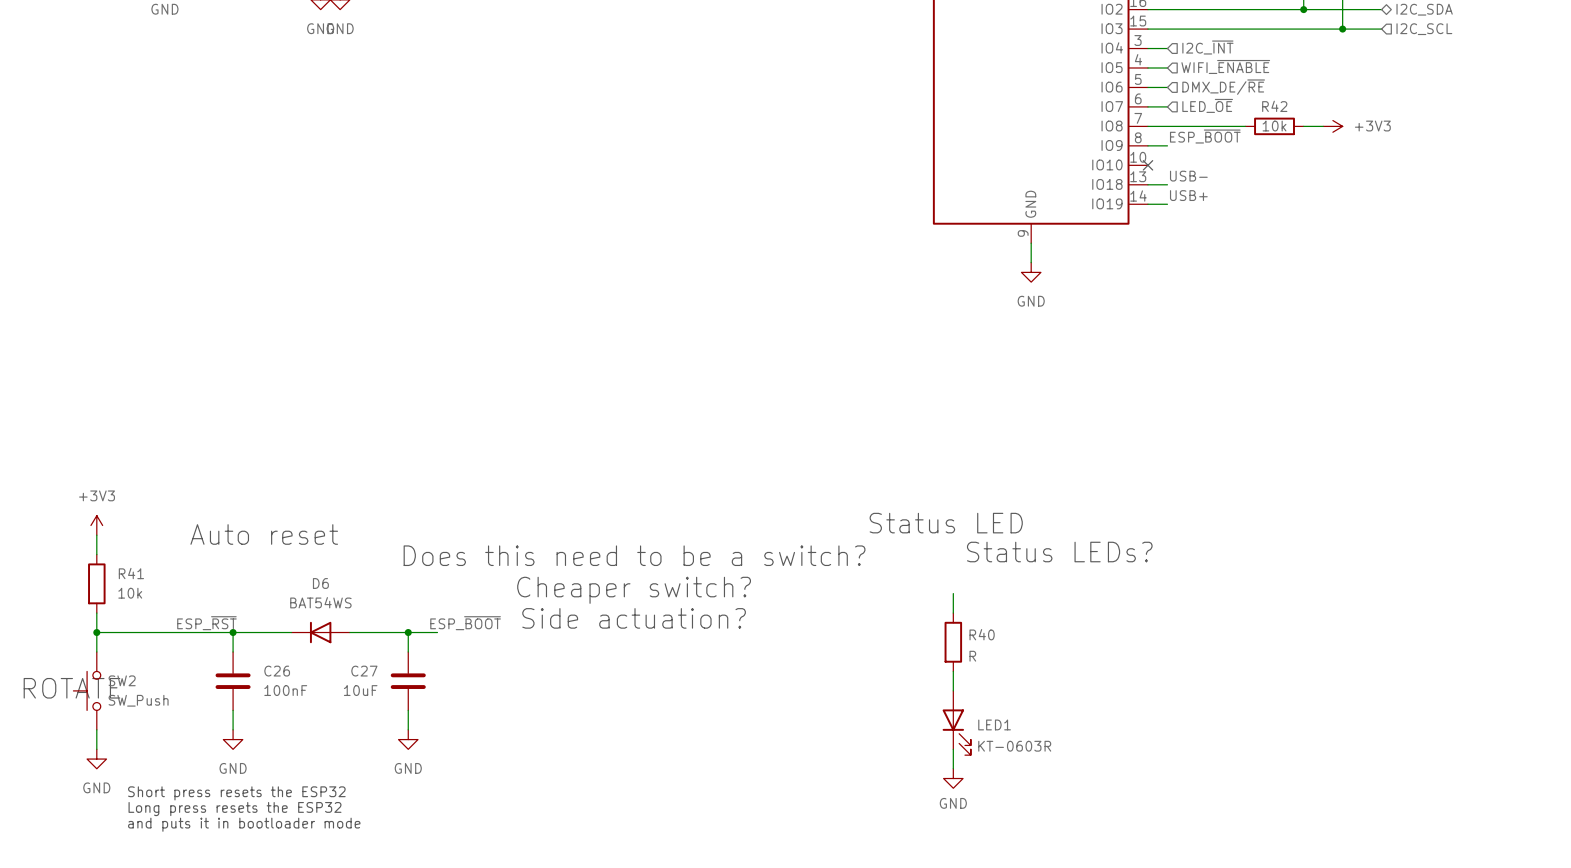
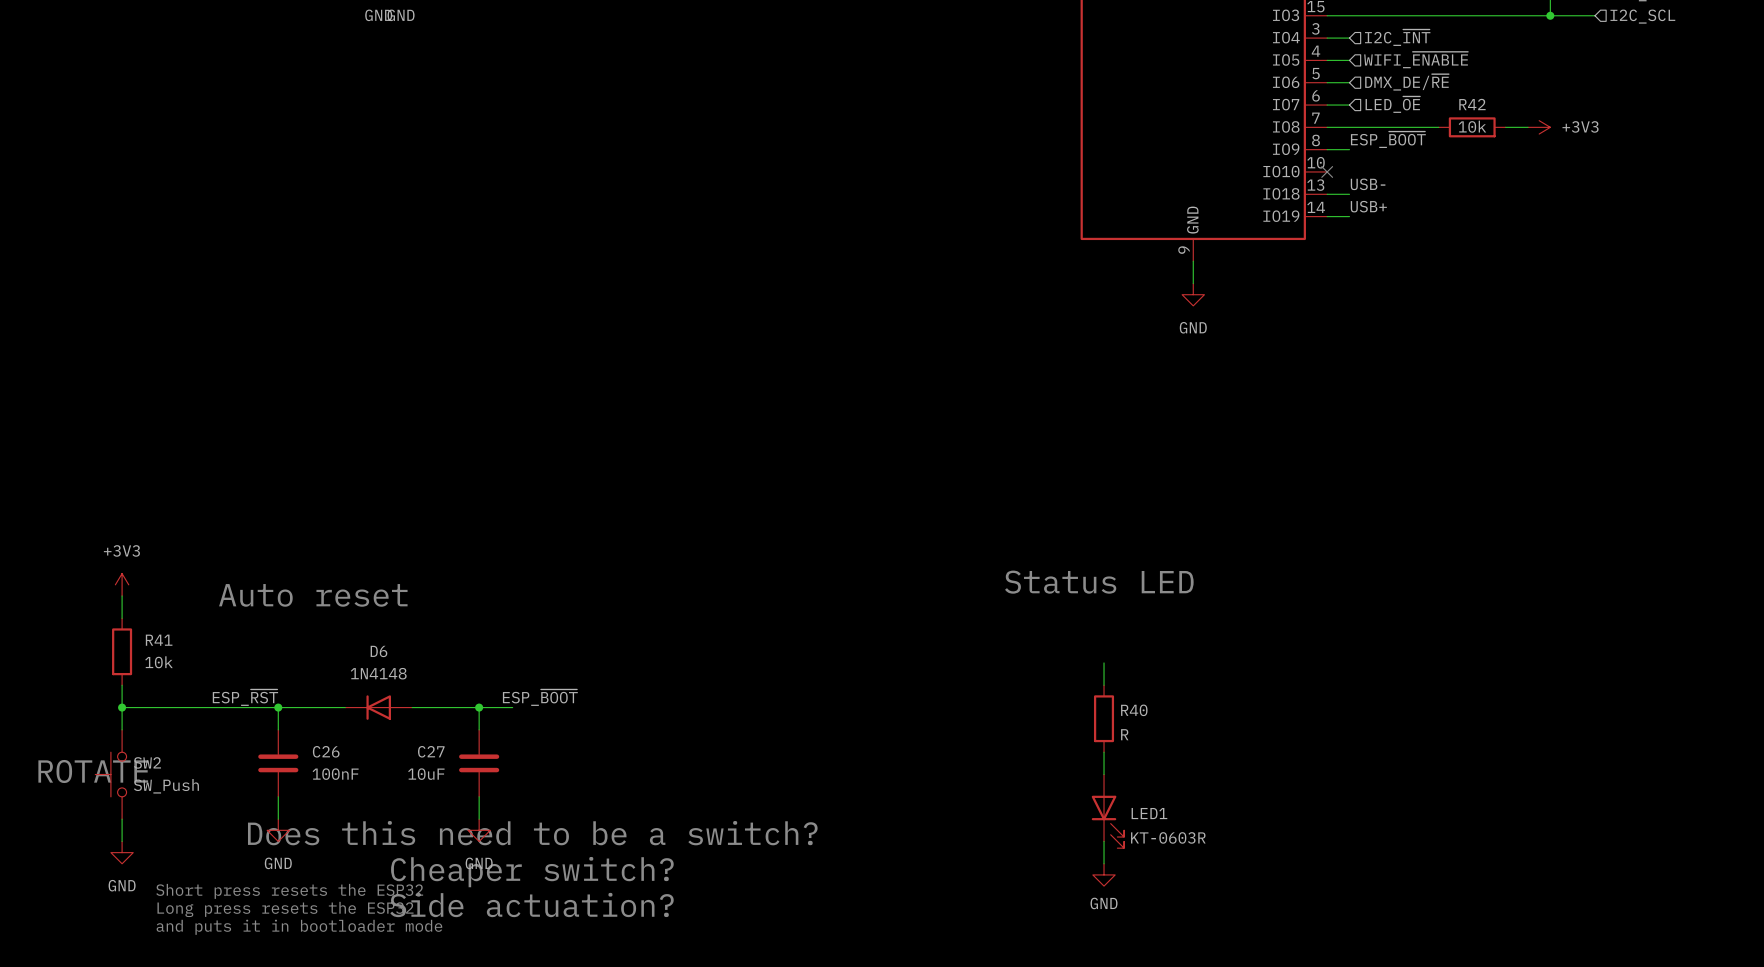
text: Status LEDs? (1059, 552) -> none
text: Does this need to be a switch? (634, 555) -> none
text: Cheaper switch? (634, 590) -> none
D6 value: BAT54WS (320, 602) -> 1N4148 (378, 673)
text: Side actuation? (634, 618) -> none
text: none -> Does this need to be a switch? (532, 833)
text: none -> Cheaper switch? (532, 872)
text: none -> Side actuation? (531, 905)

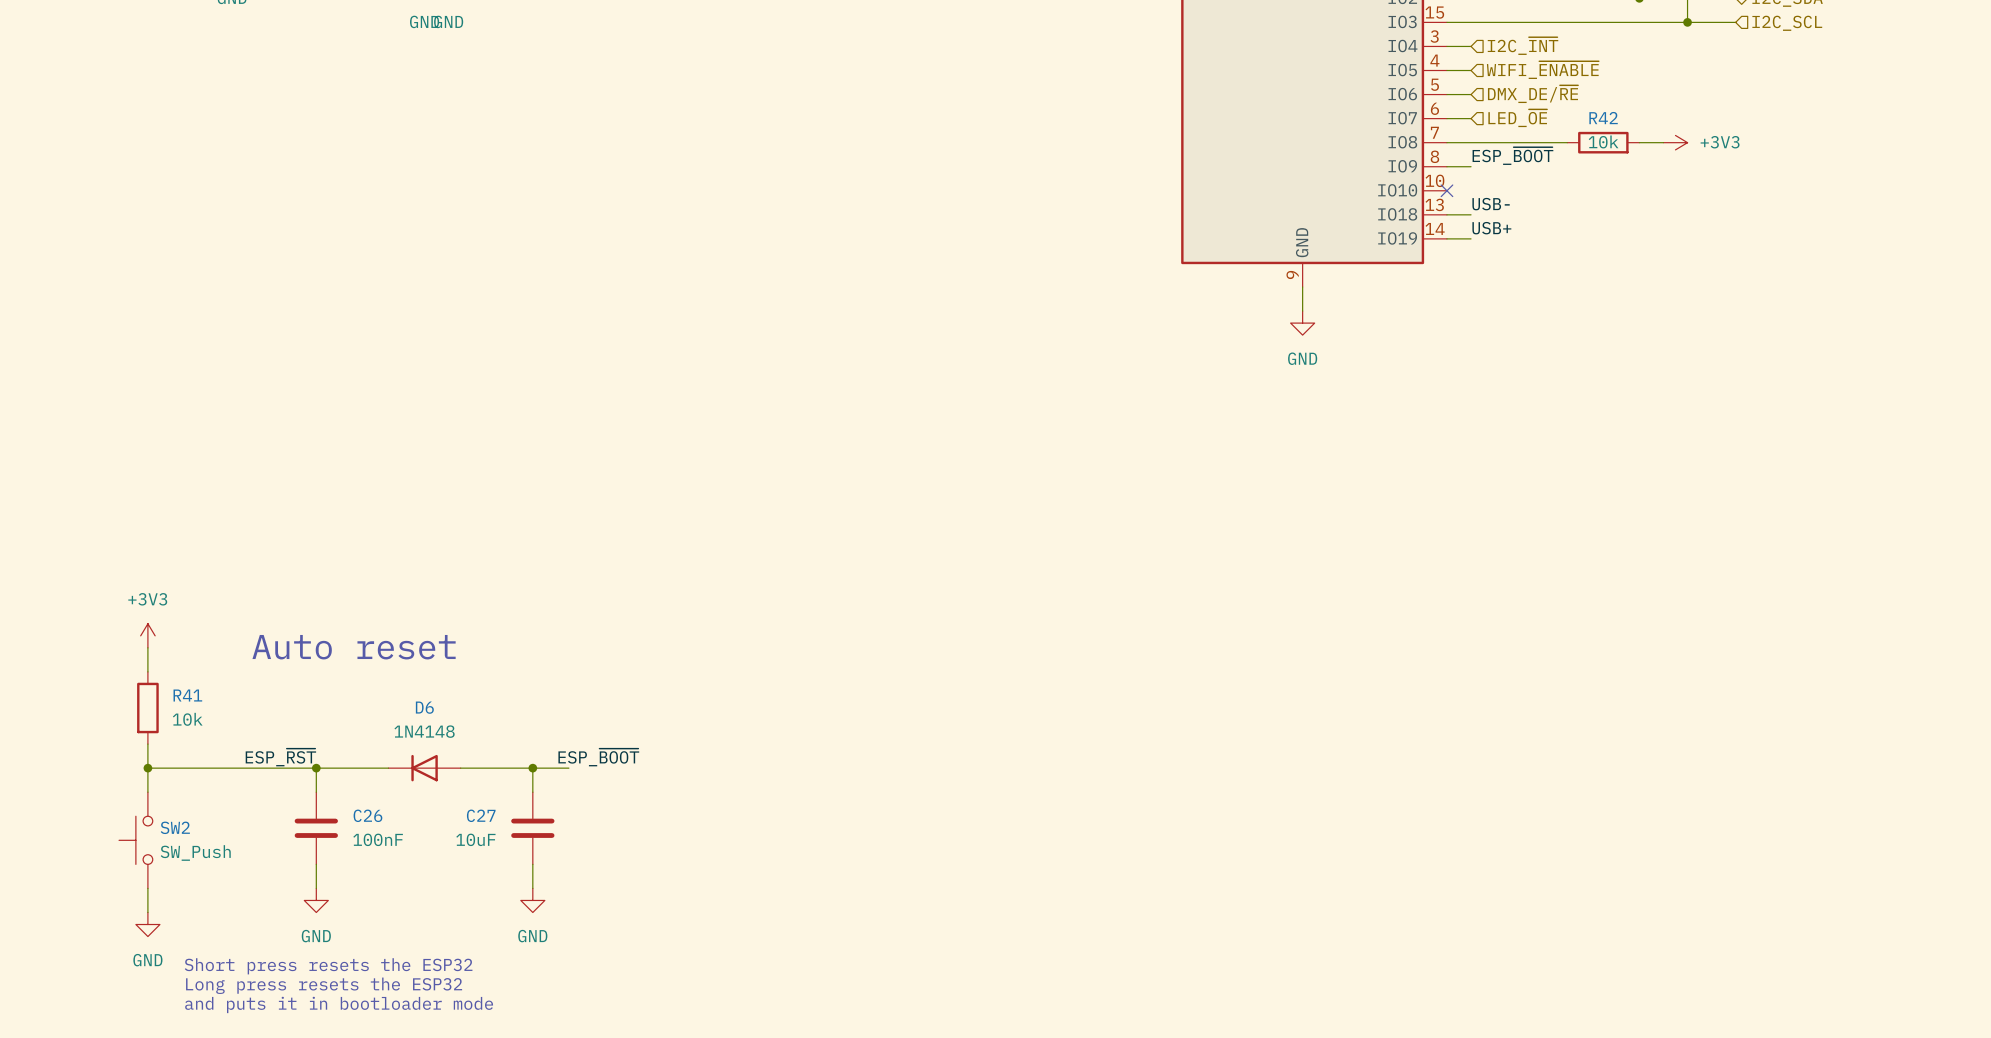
text: Status LED (1099, 582) -> none
wire: (1104, 662) (1104, 685) -> none
R40: R (1104, 718) -> none
wire: (1104, 752) (1104, 774) -> none
text: ROTATE (93, 771) -> none
LED1: KT-0603R (1107, 811) -> none
text: Does this need to be a switch? (532, 833) -> none
wire: (1104, 841) (1104, 863) -> none
text: Cheaper switch? (532, 872) -> none
power symbol: GND (1104, 874) -> none
text: Side actuation? (531, 905) -> none

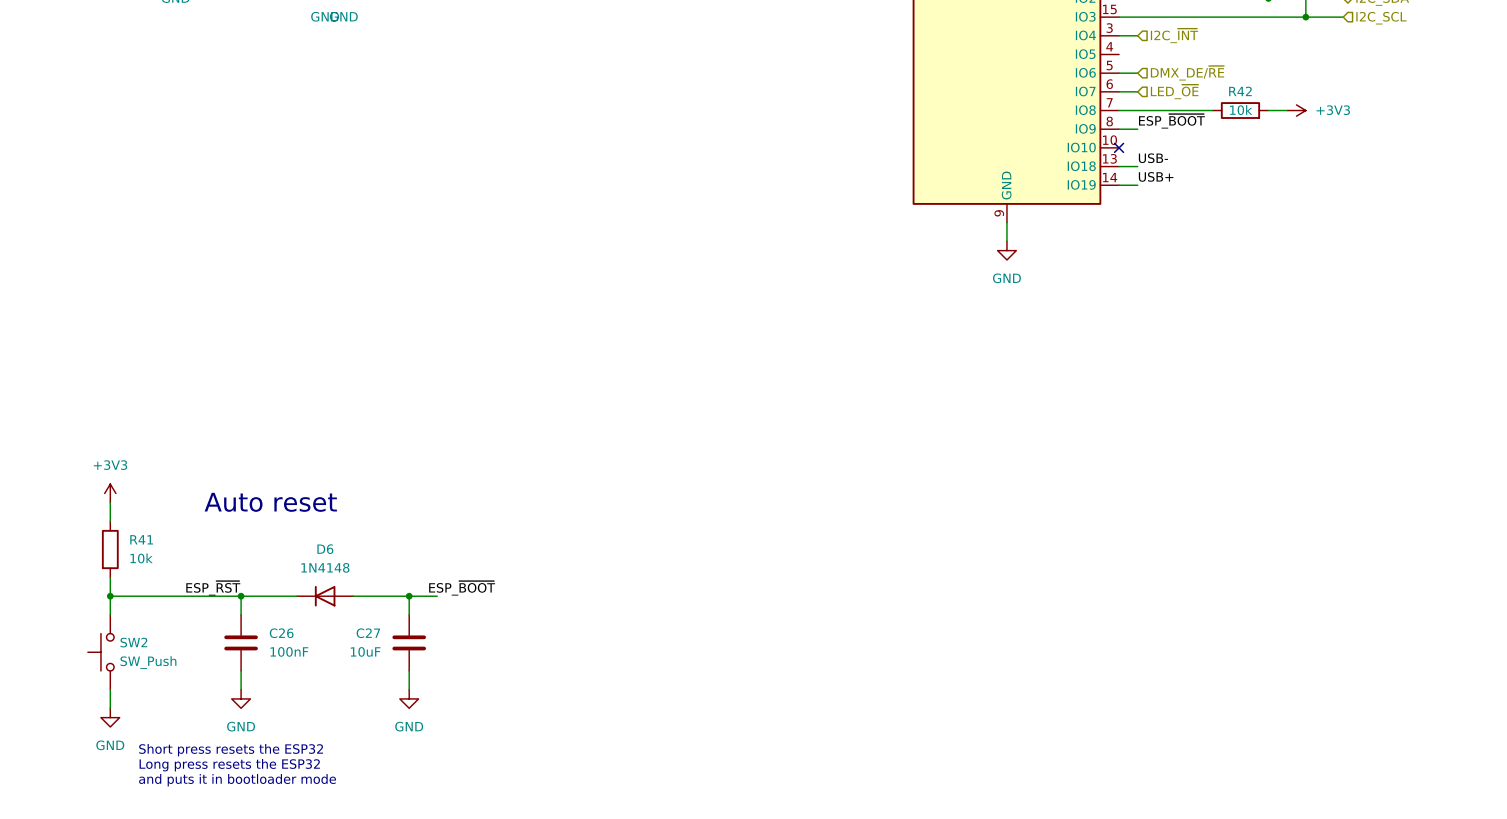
wire: (1446, 70) (1471, 70) -> none
hierarchical label: WIFI_~{ENABLE} (1542, 70) -> none

